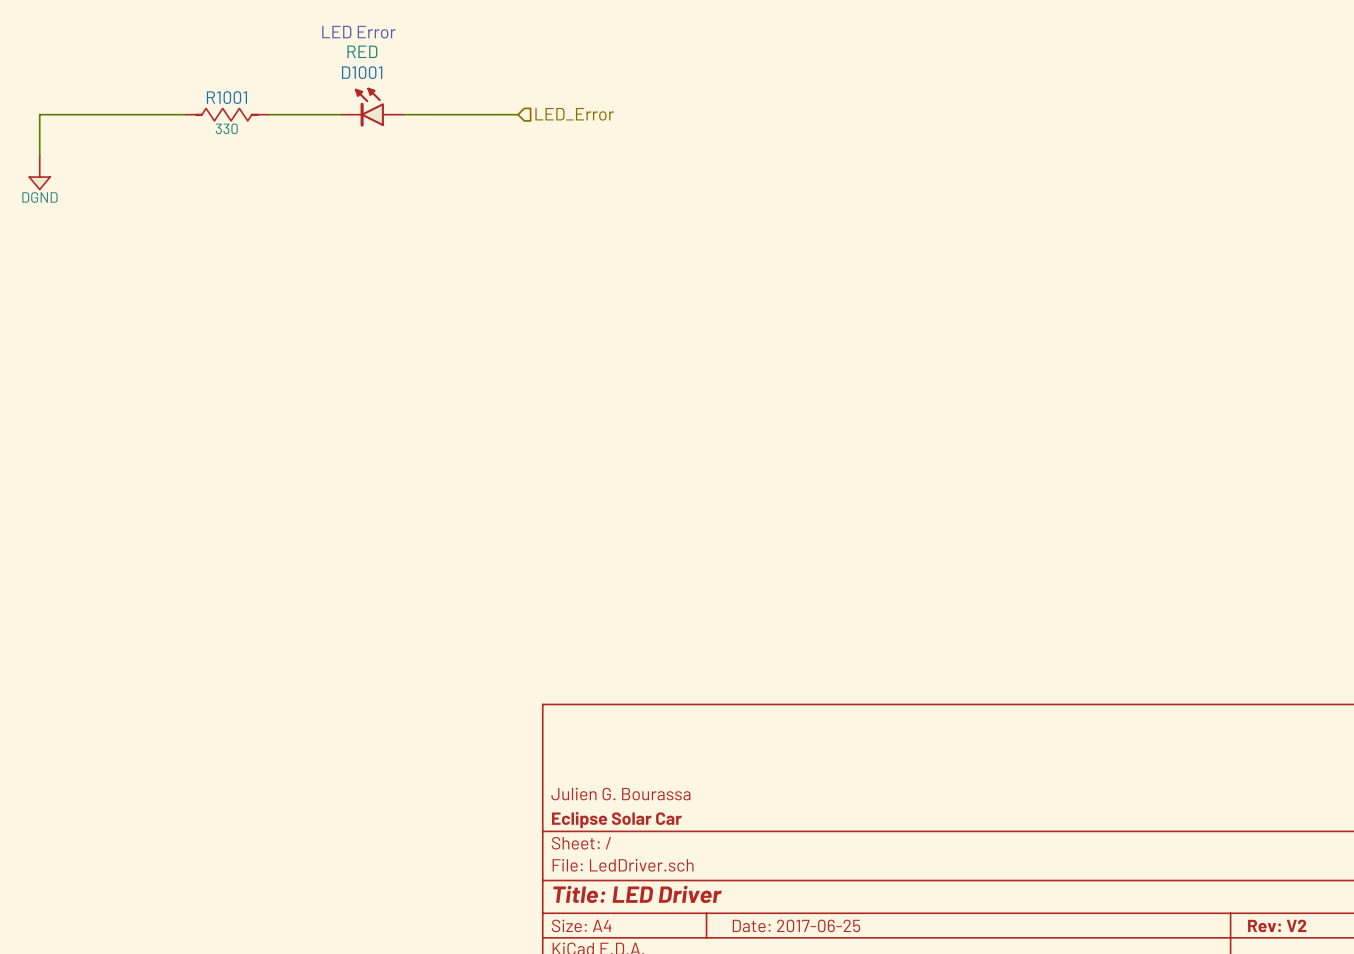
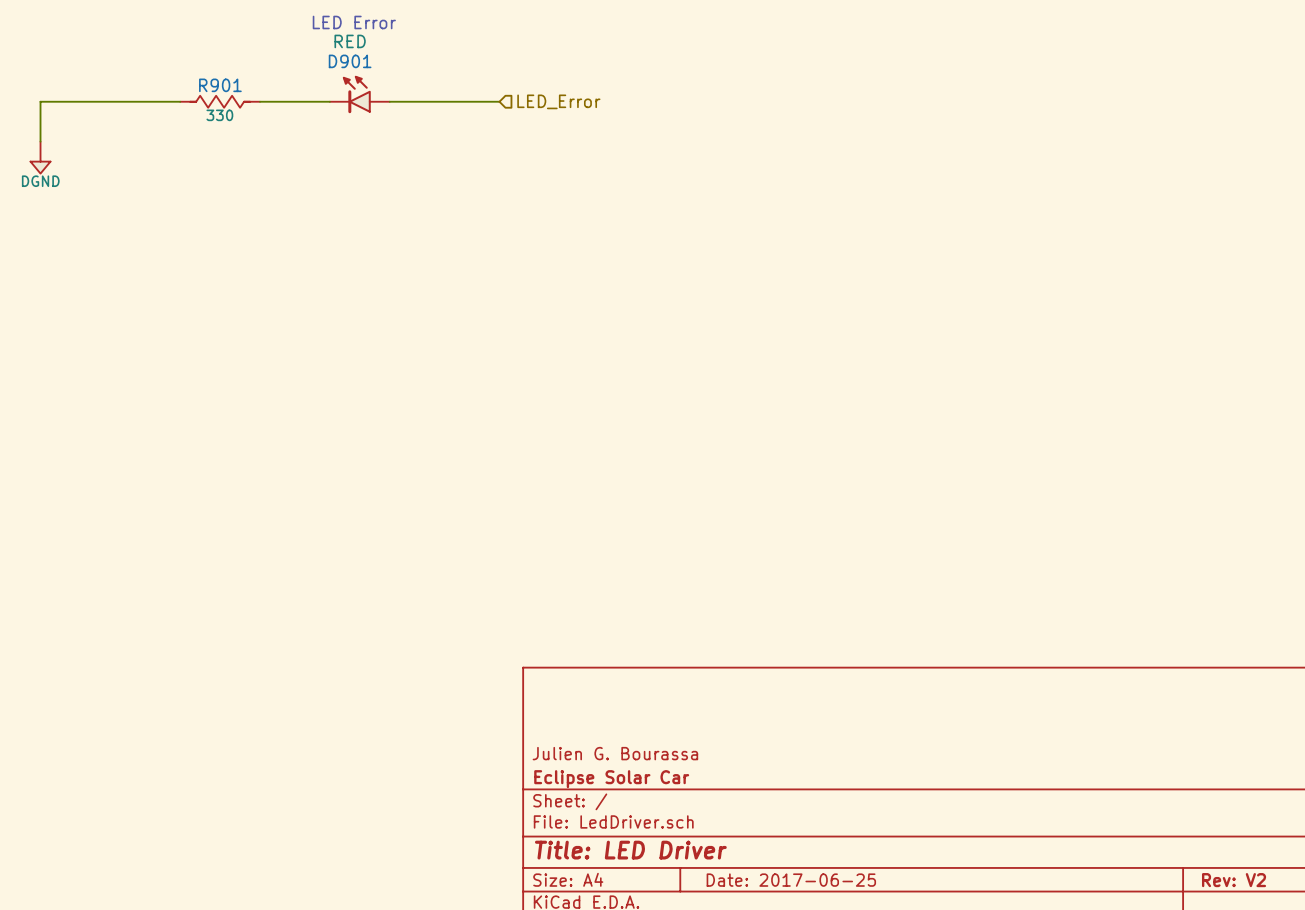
D1001 name: D1001 (362, 72) -> D901 (350, 61)
R1001 name: R1001 (226, 97) -> R901 (220, 85)

